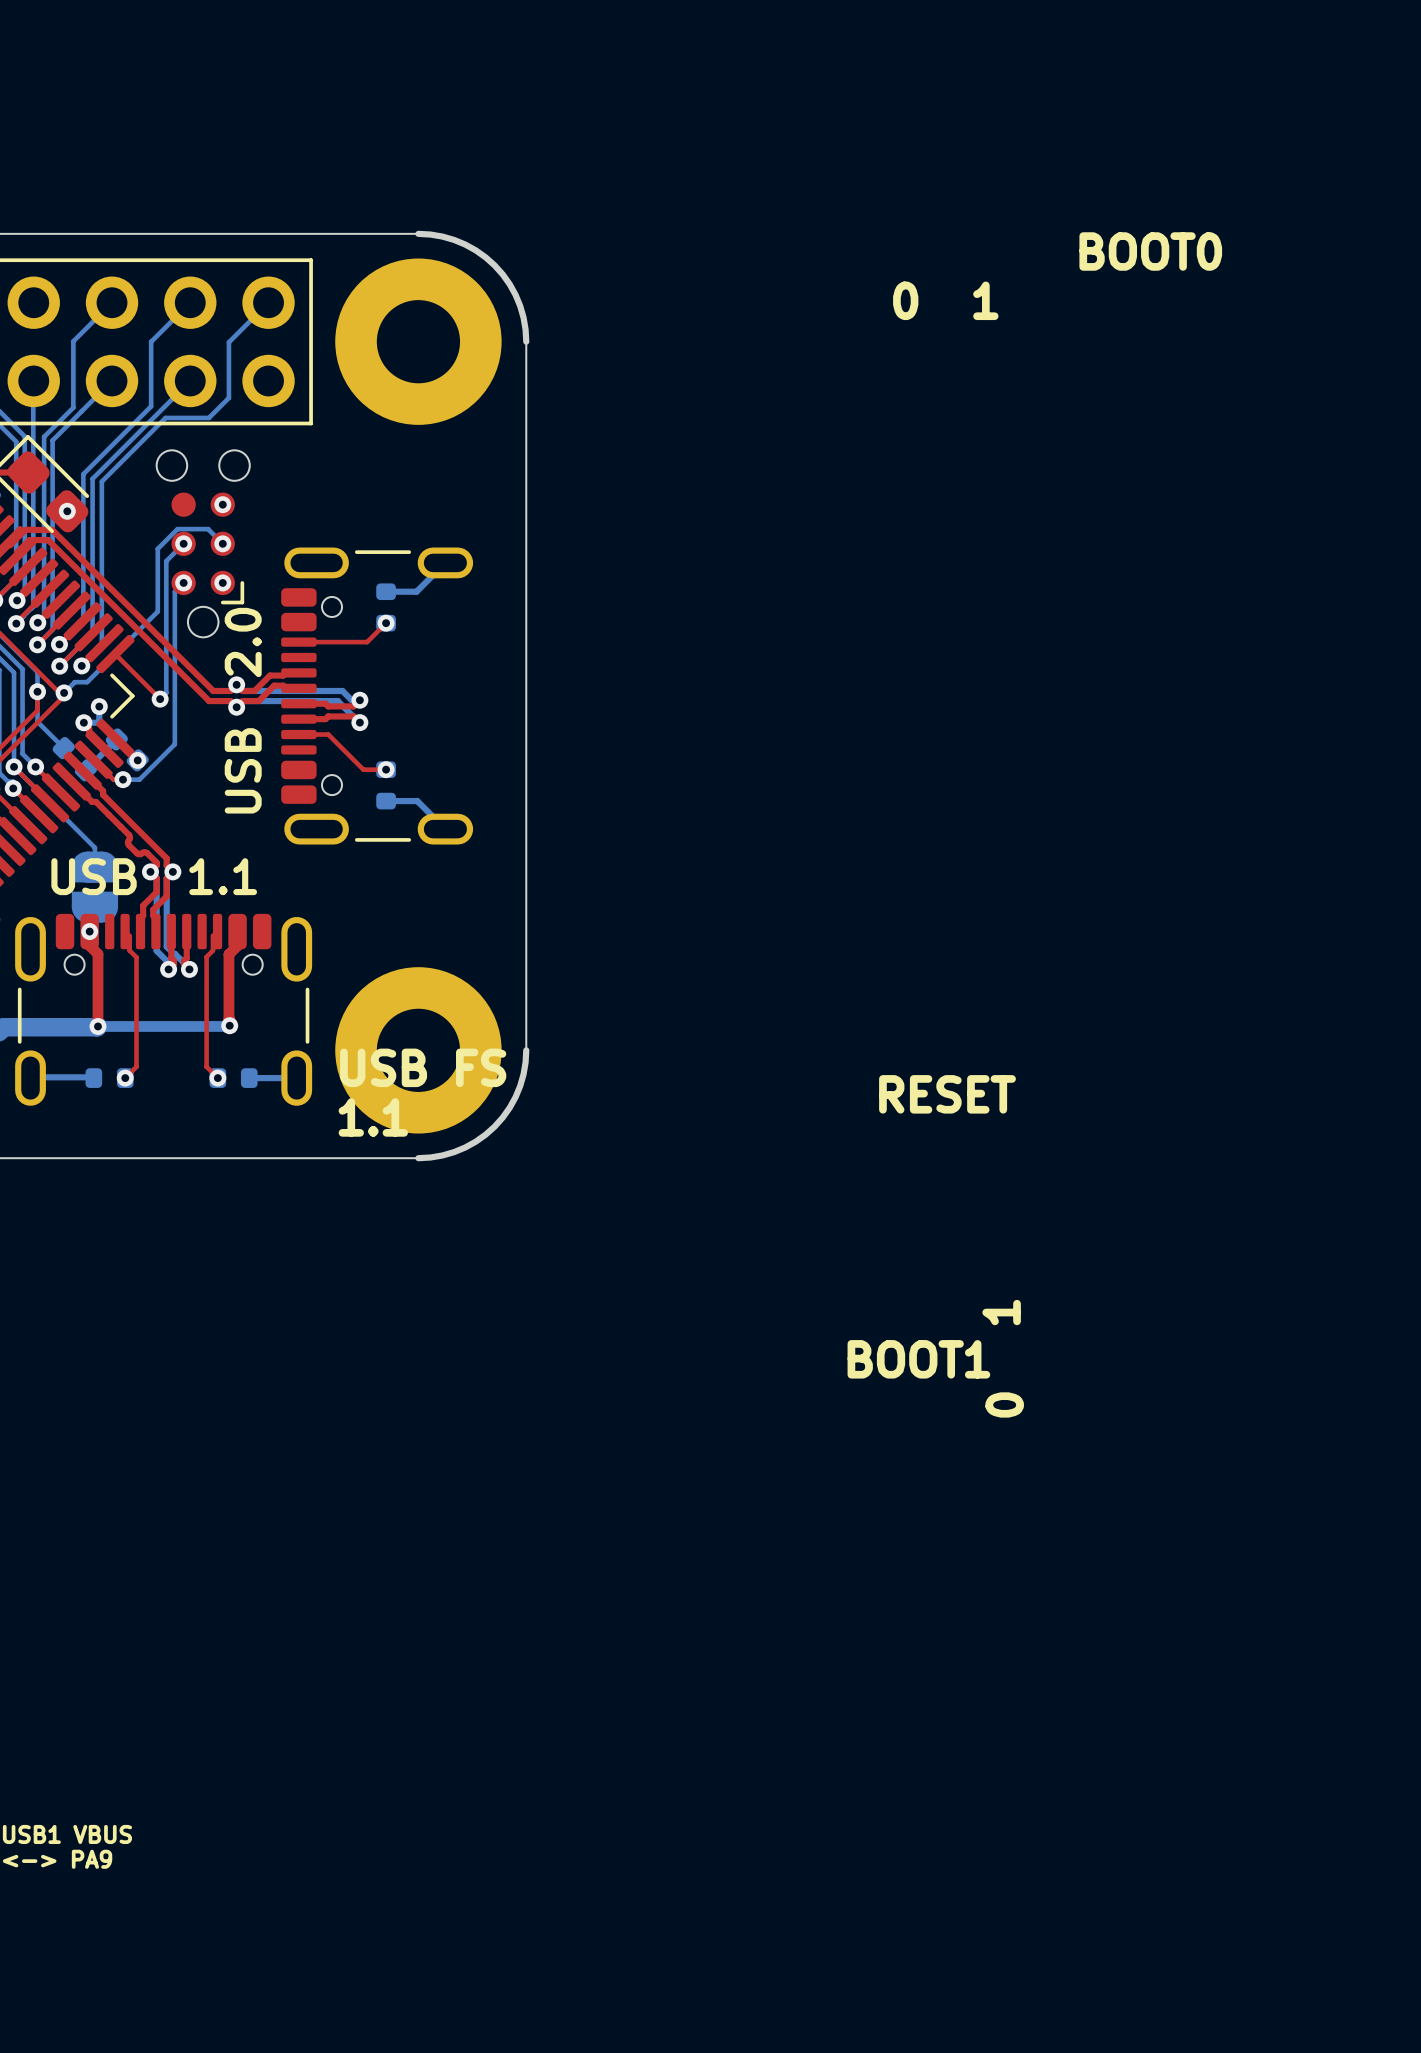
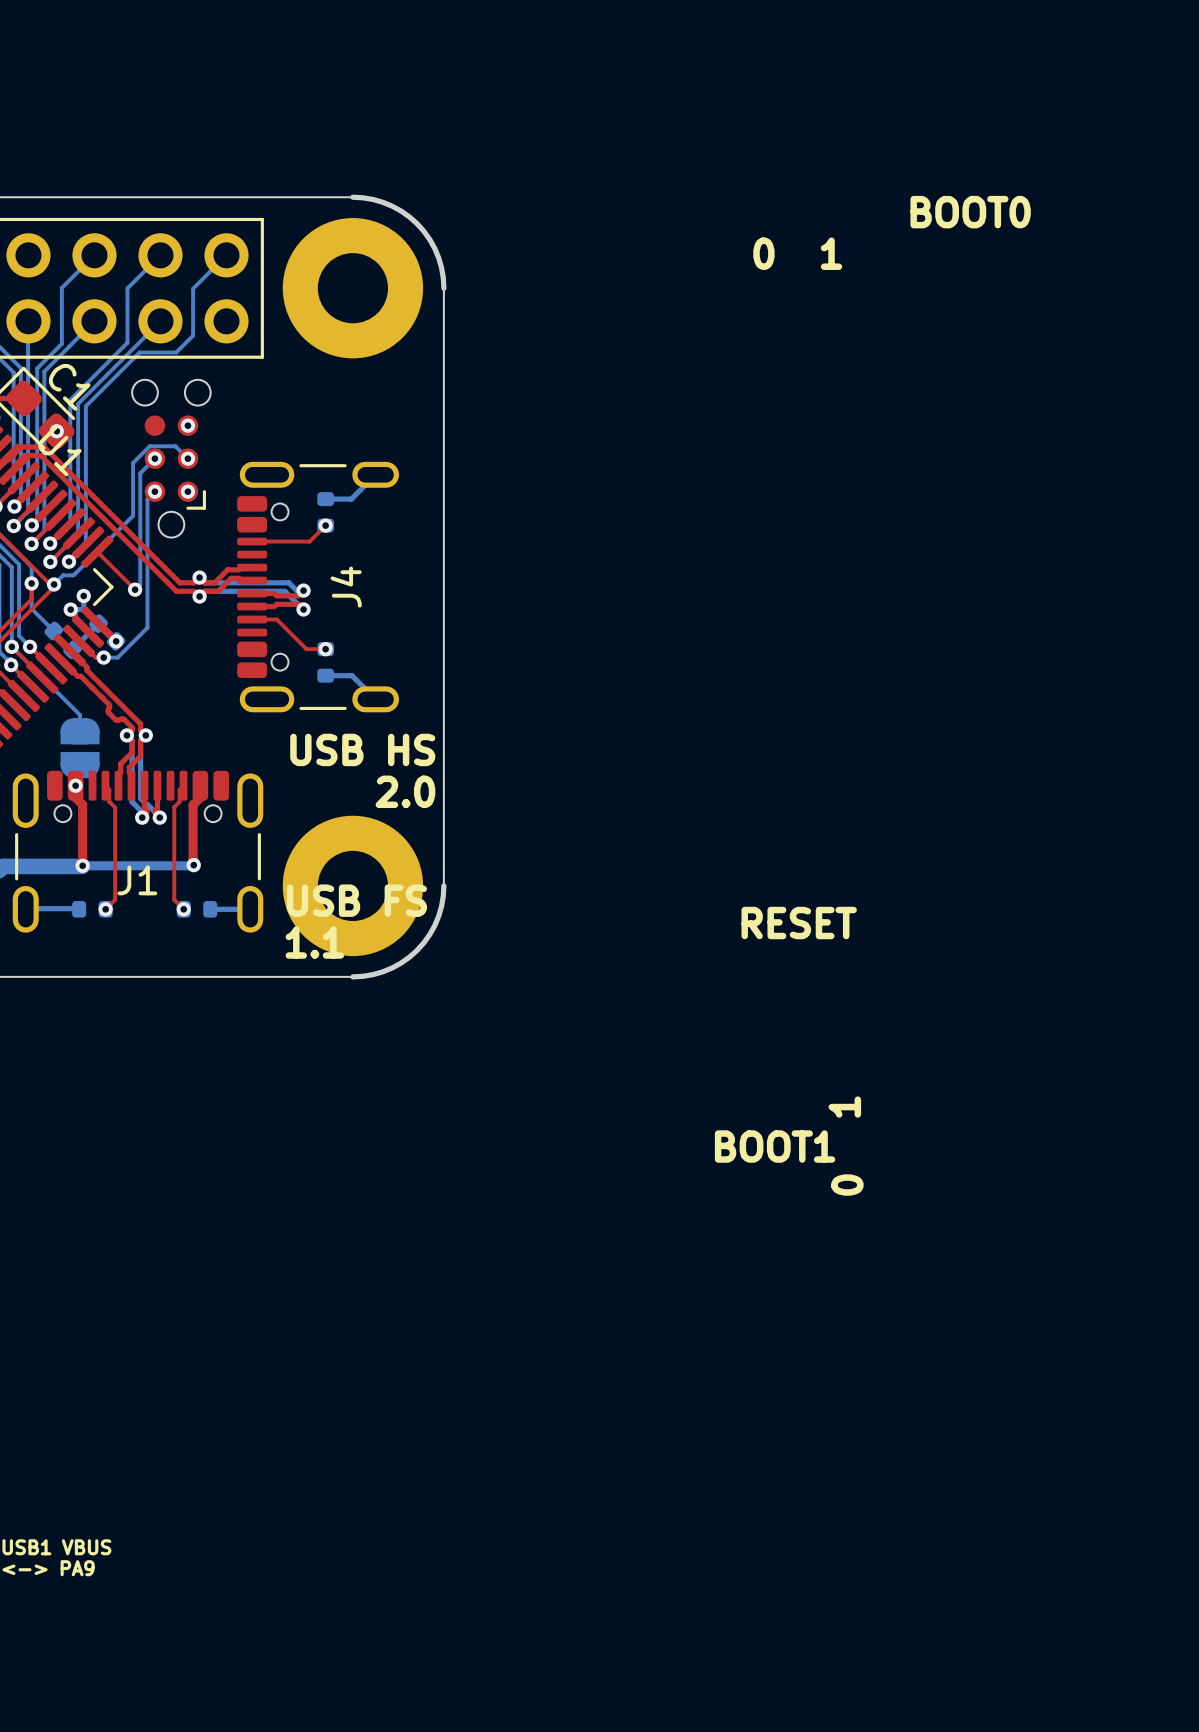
C1 name: none -> C1 (69, 387)
U1 name: none -> U1 (59, 450)
J4 name: none -> J4 (346, 587)
J4 text: USB 2.0 (243, 710) -> none
J1 text: USB 1.1 (154, 876) -> none
text: none -> USB HS (362, 749)
text: none -> 2.0 (405, 791)
J1 name: none -> J1 (137, 880)

